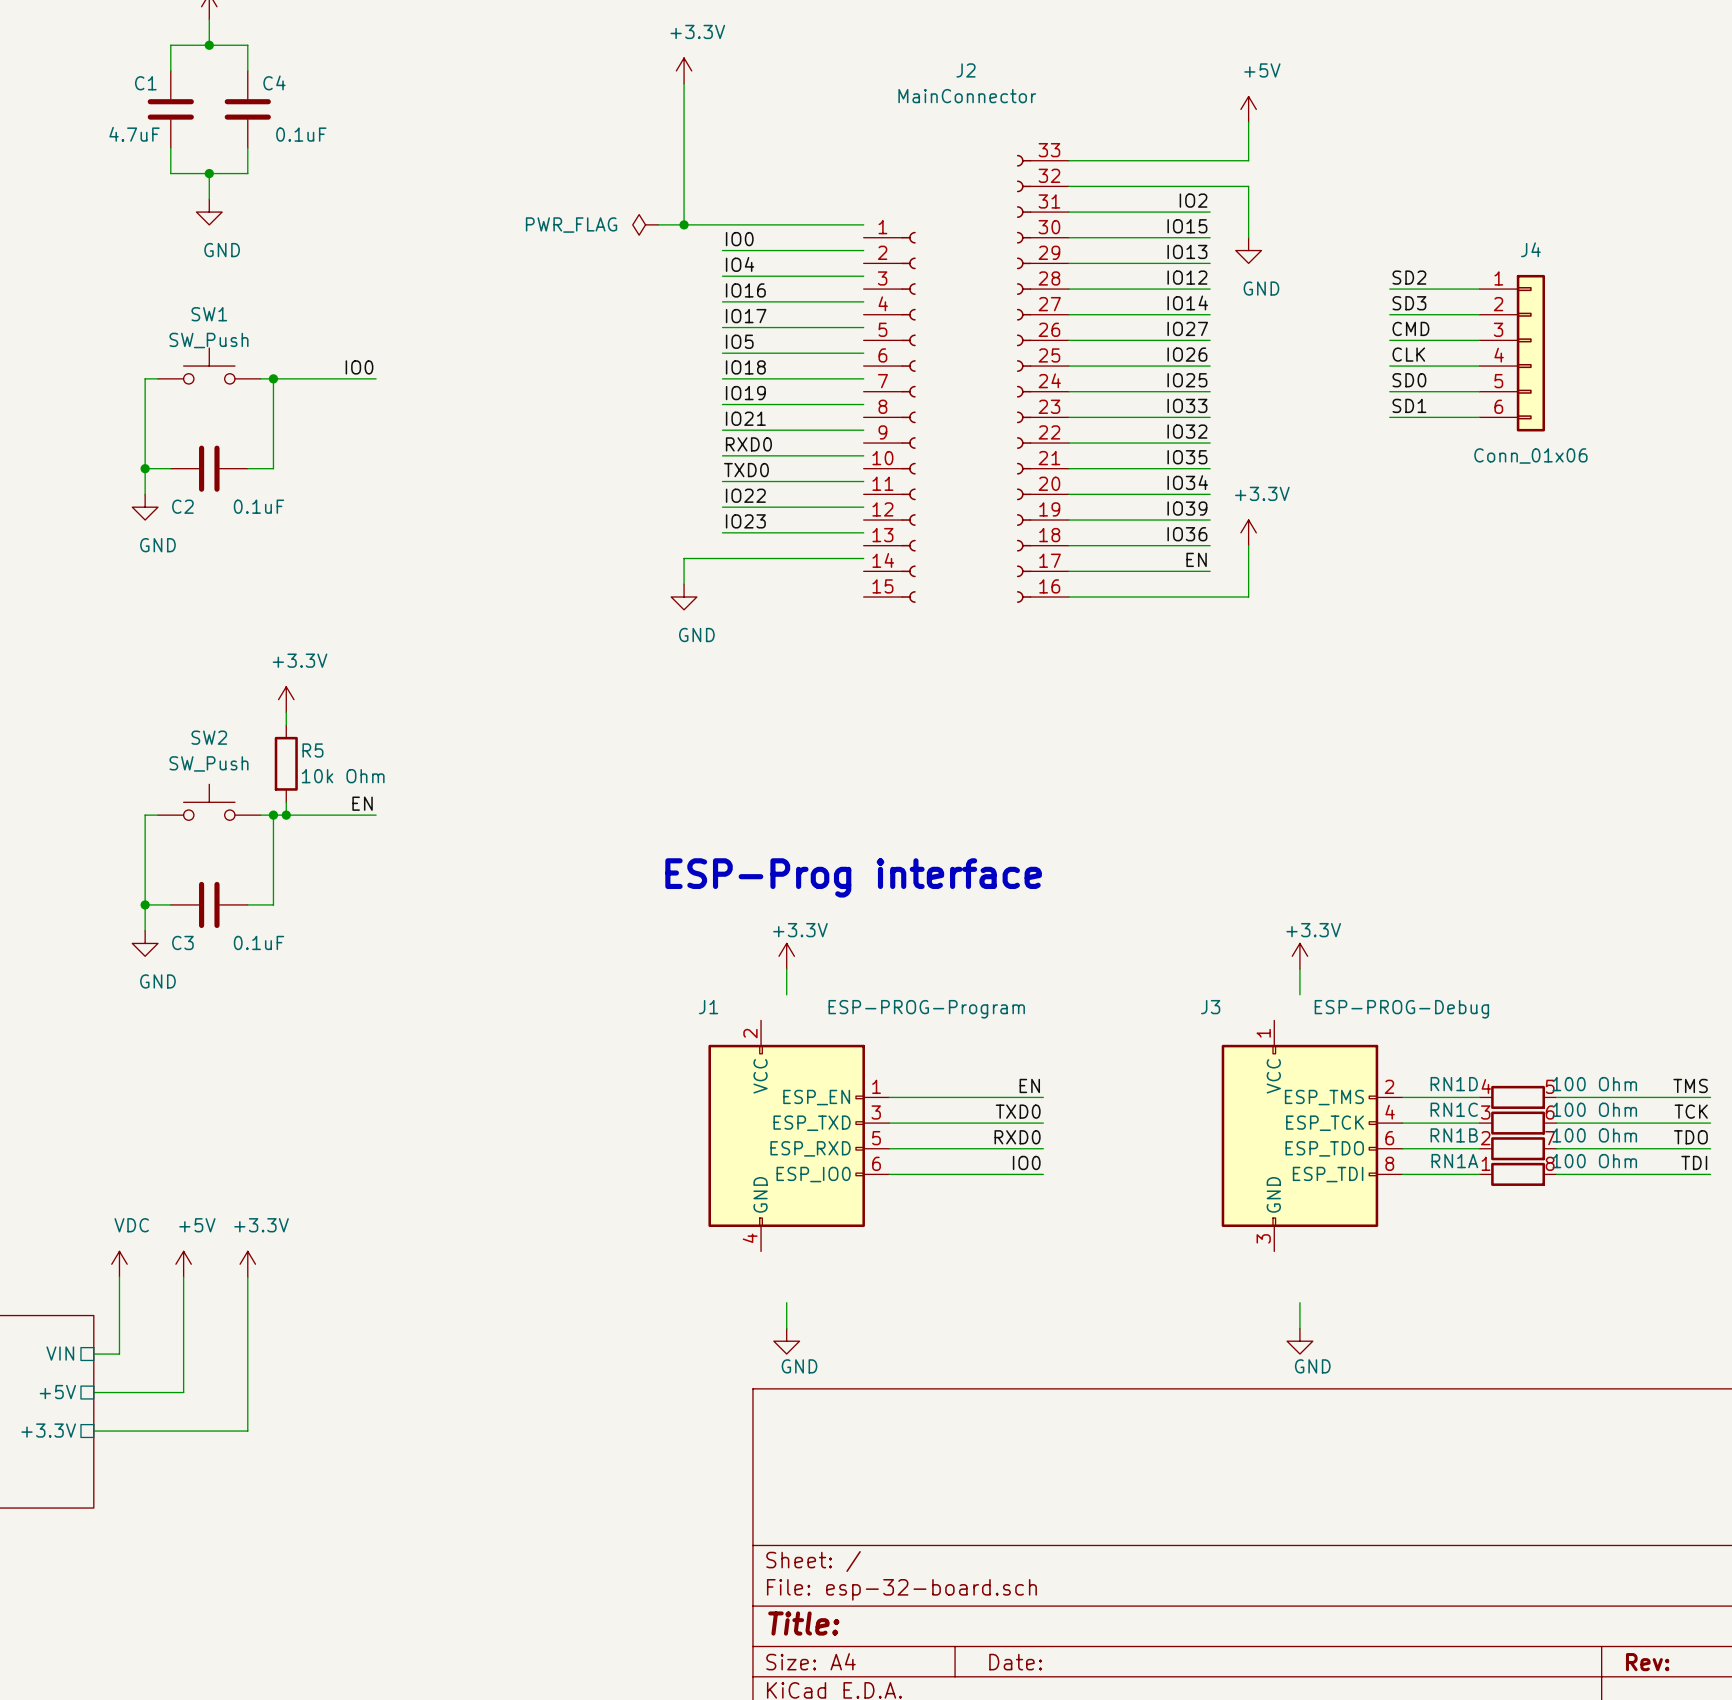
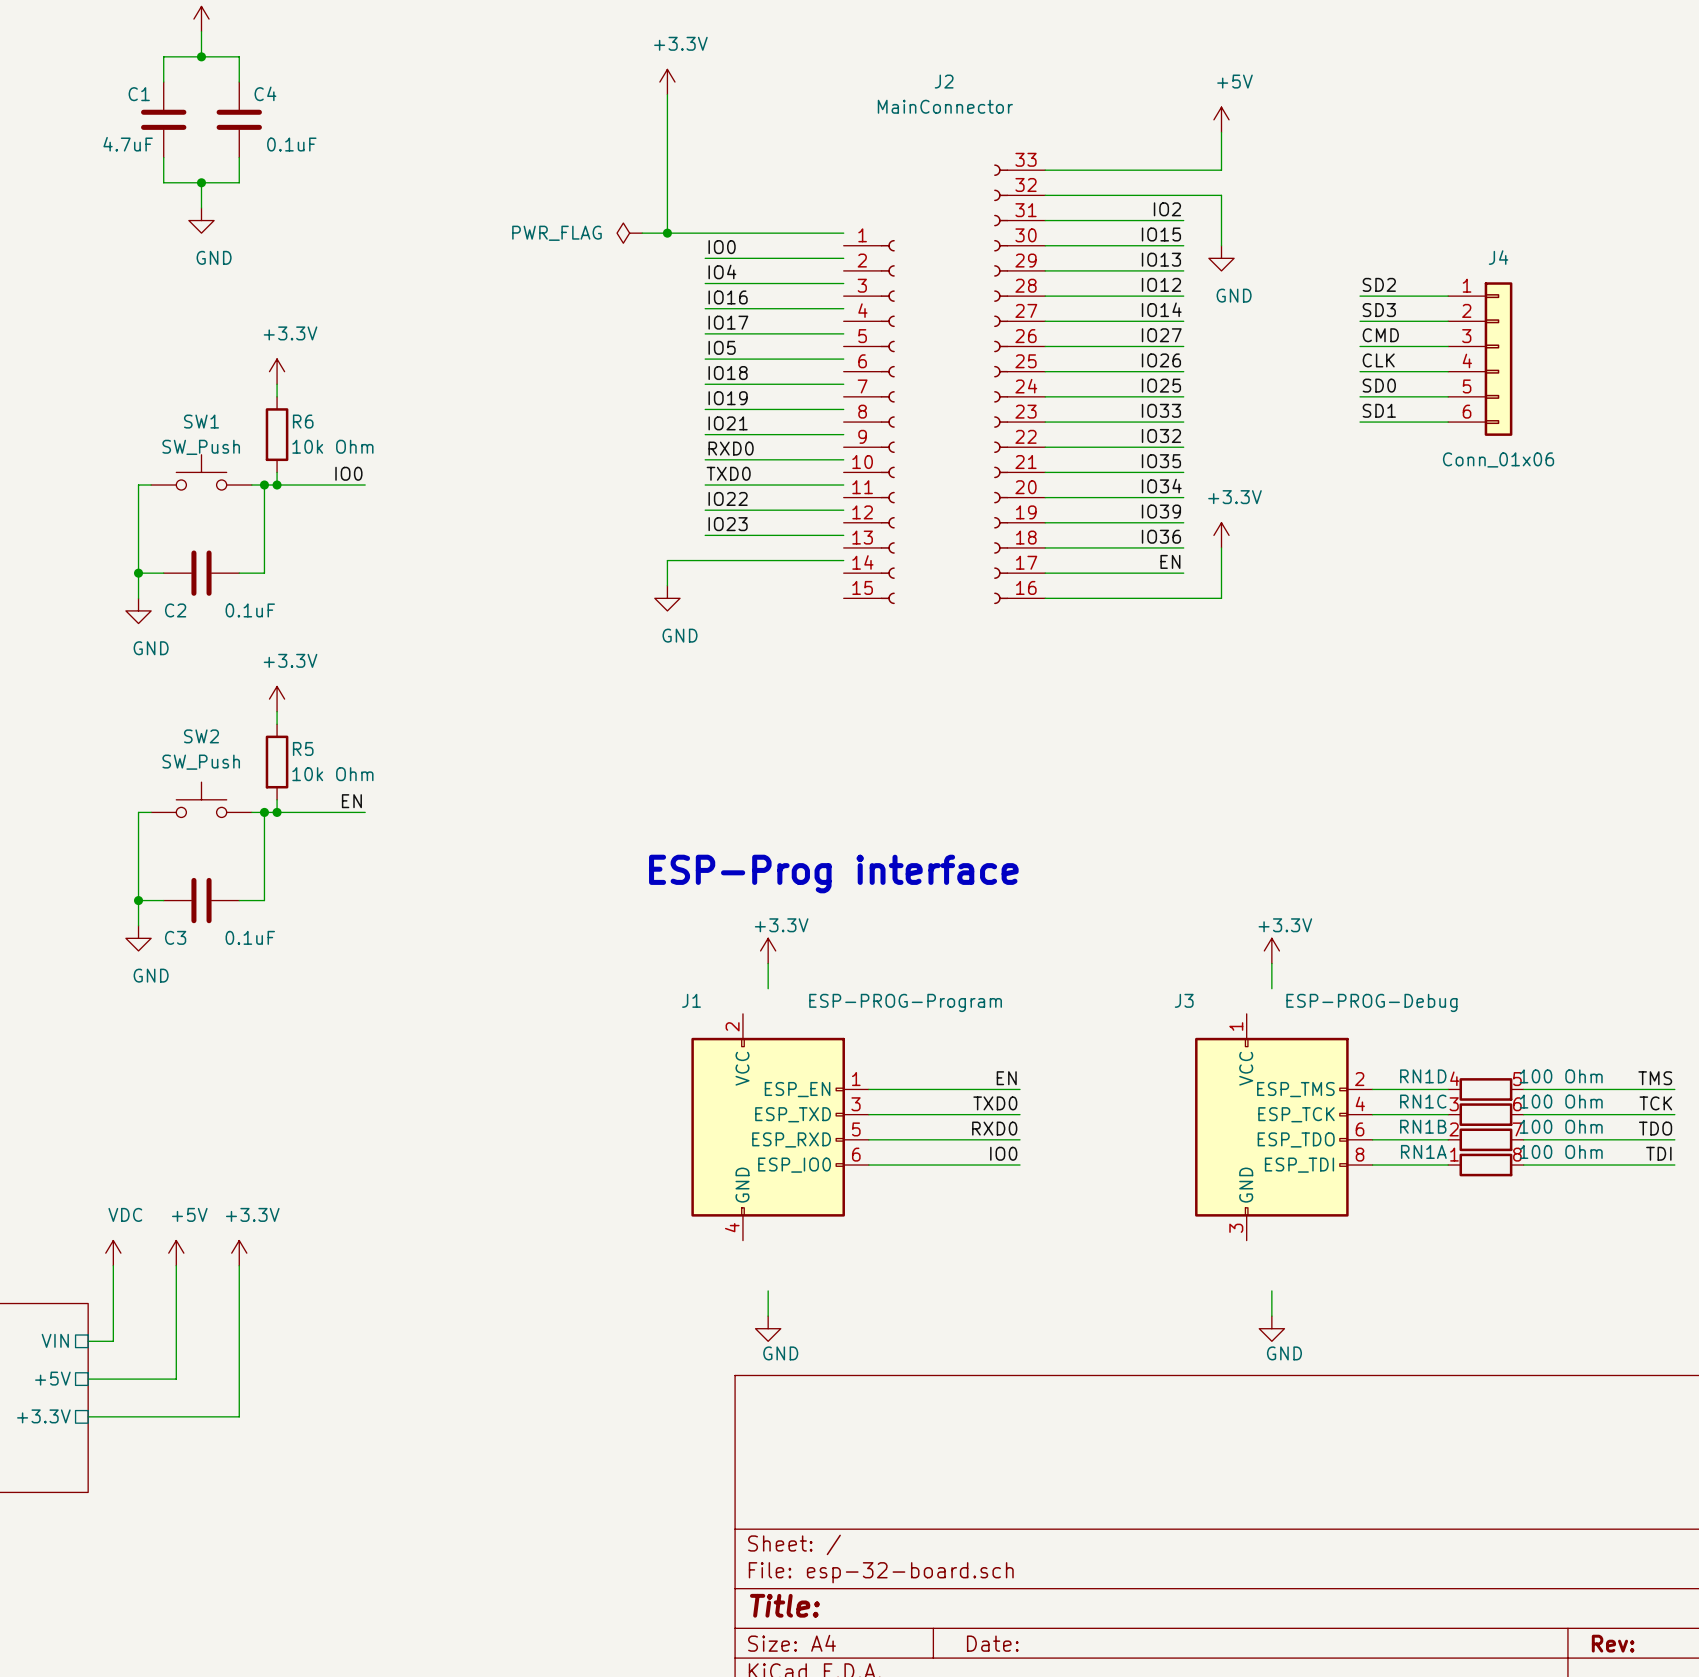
SW1 position: (209, 366) -> (201, 472)
power symbol: none -> +3.3V (277, 371)
label position: IO0 (359, 367) -> IO0 (348, 473)
wire: (157, 378) (145, 378) (145, 481) -> (151, 485) (138, 485)
wire: (260, 378) (376, 378) -> (251, 485) (365, 485)
wire: (273, 378) (273, 468) (247, 468) -> (264, 485) (264, 573) (239, 573)
junction: (273, 378) -> none
wire: none -> (277, 384) (277, 396)
R6: none -> 10k Ohm (277, 434)
wire: (145, 468) (170, 468) -> (138, 573) (163, 573)
junction: (145, 468) -> none
C2 position: (209, 468) -> (201, 573)
wire: none -> (277, 472) (277, 485)
junction: none -> (264, 485)
junction: none -> (277, 485)
wire: none -> (138, 497) (138, 598)
power symbol position: GND (145, 507) -> GND (138, 610)
junction: none -> (138, 573)

